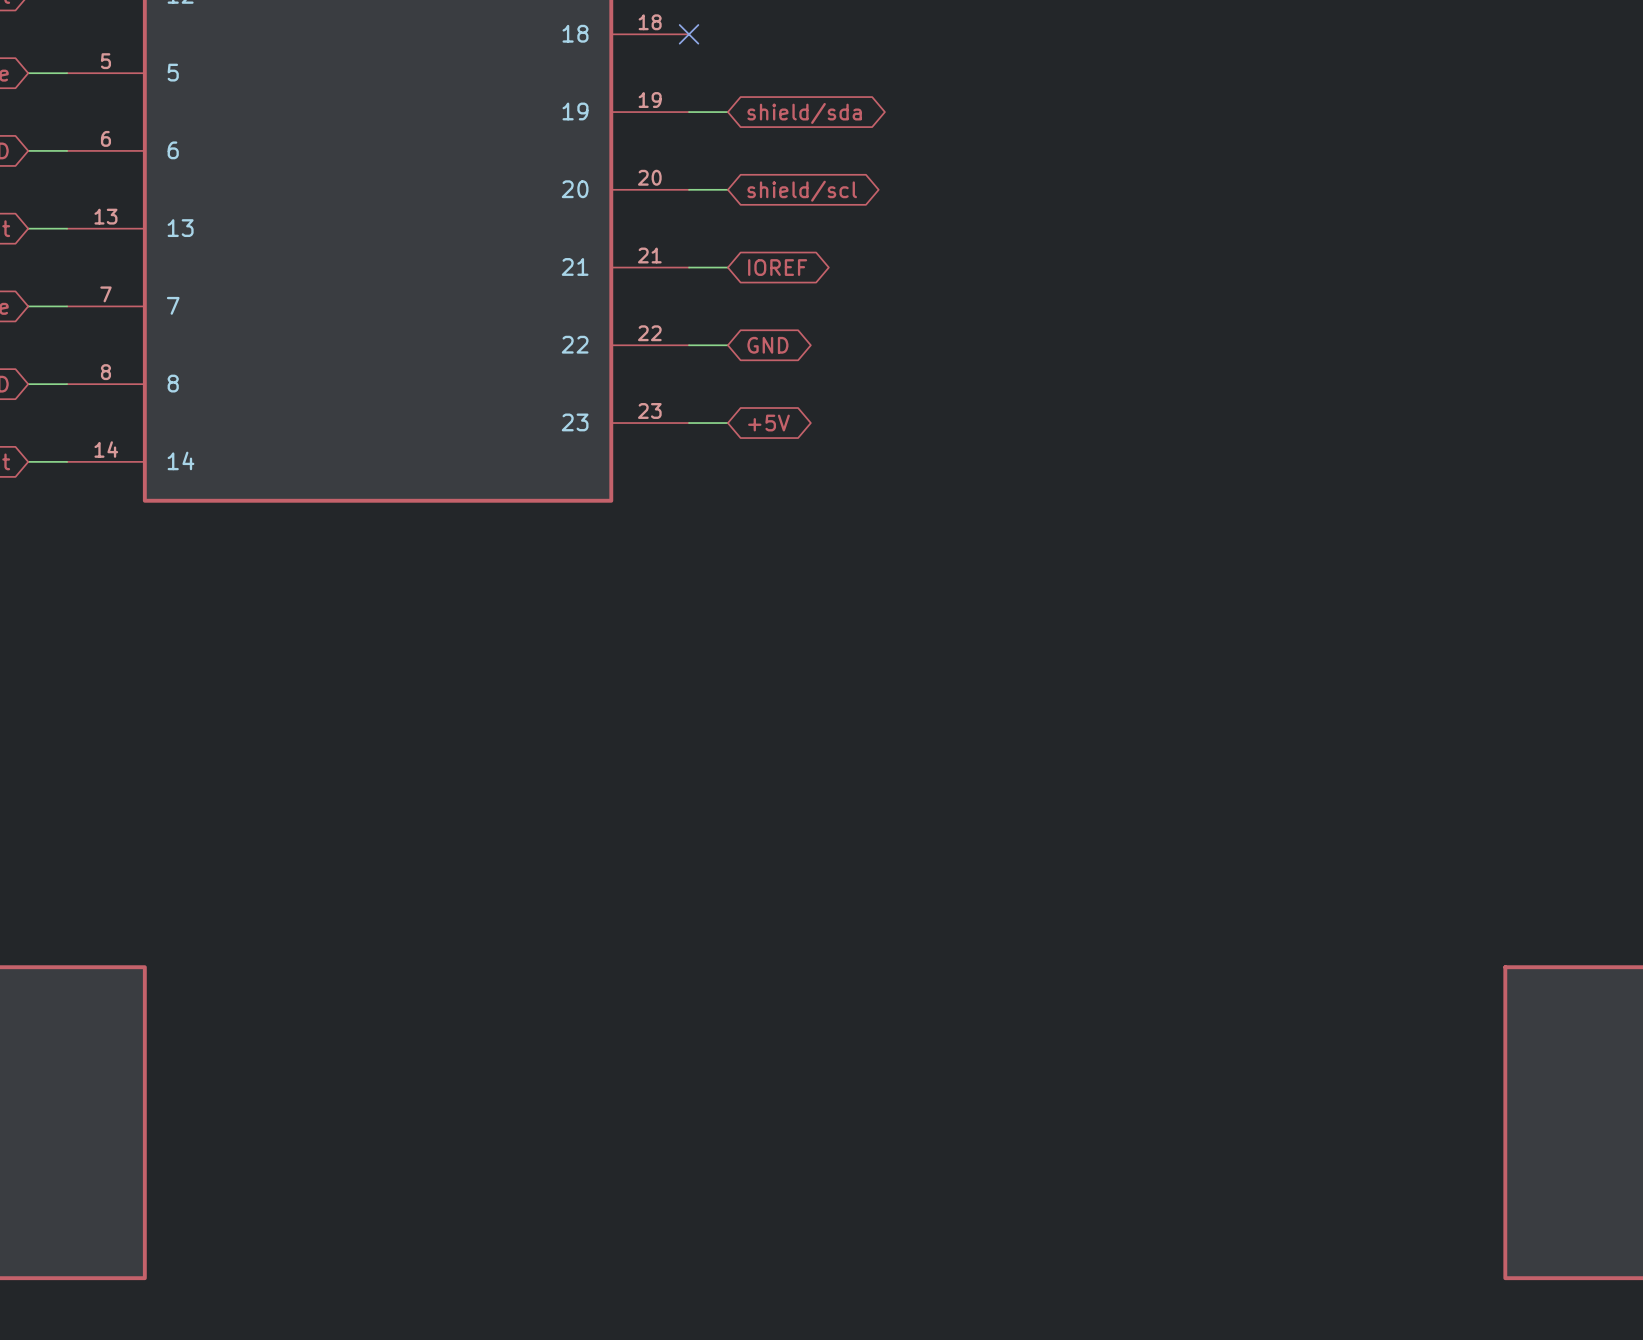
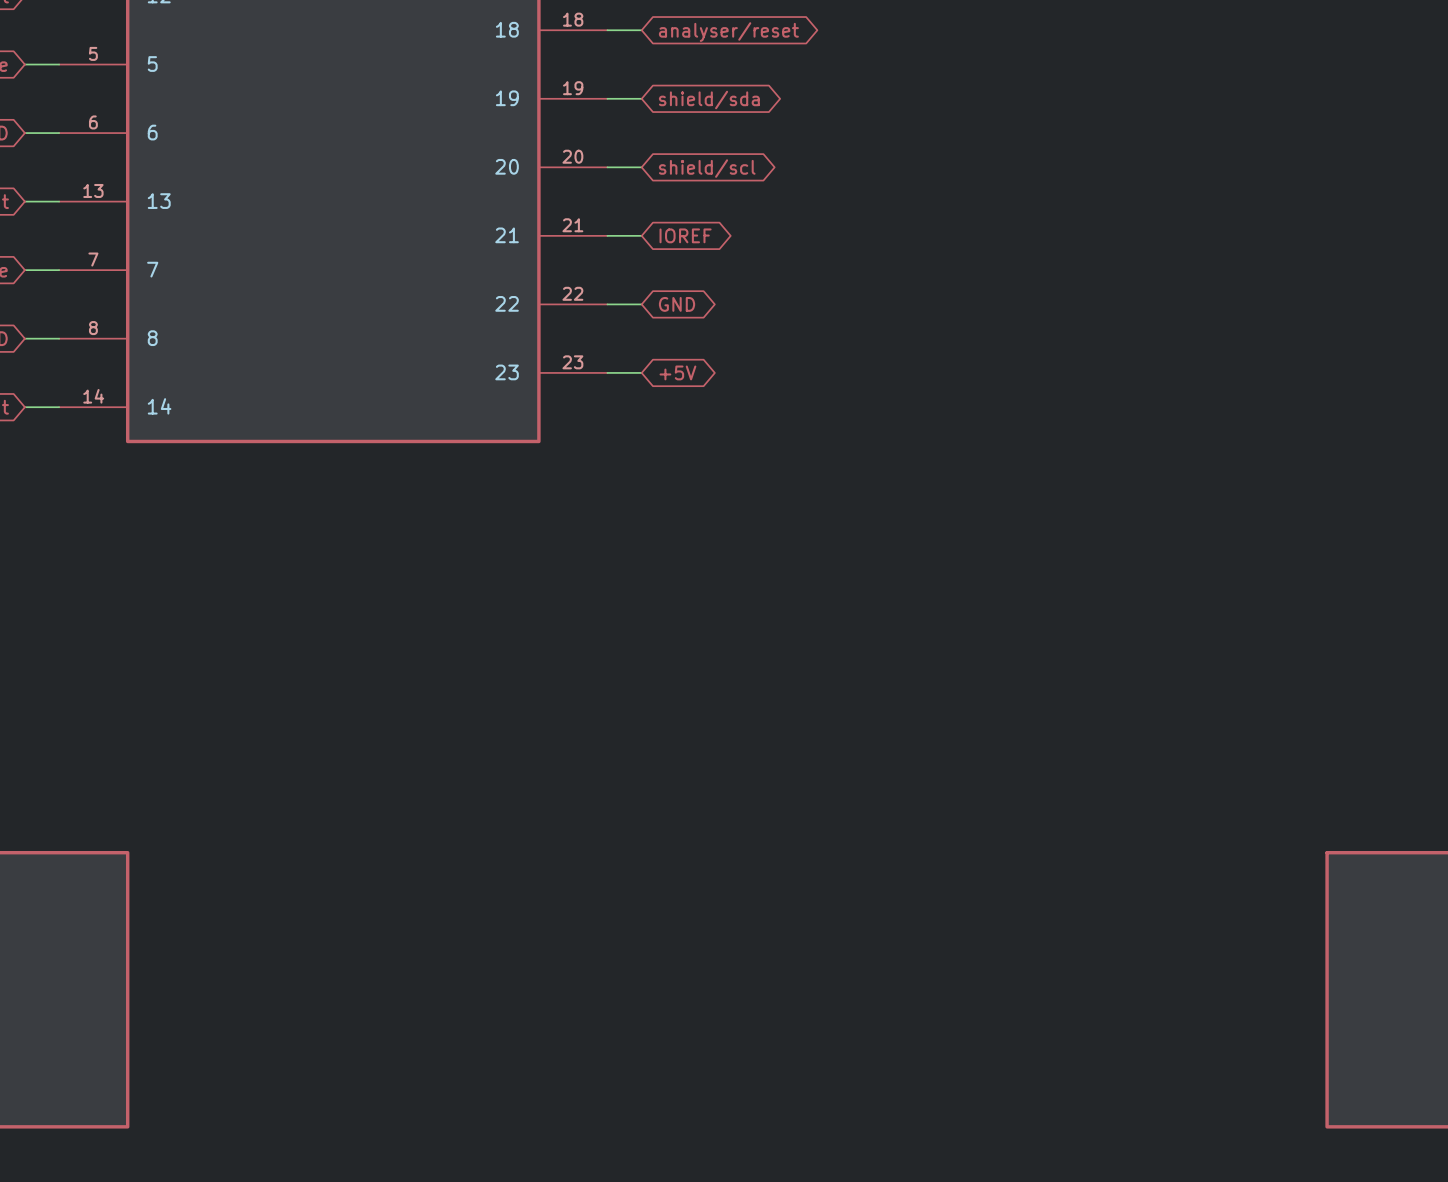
wire: none -> (607, 30) (641, 30)
no-connect mark: (689, 34) -> none
global label: none -> analyser/reset (728, 32)

